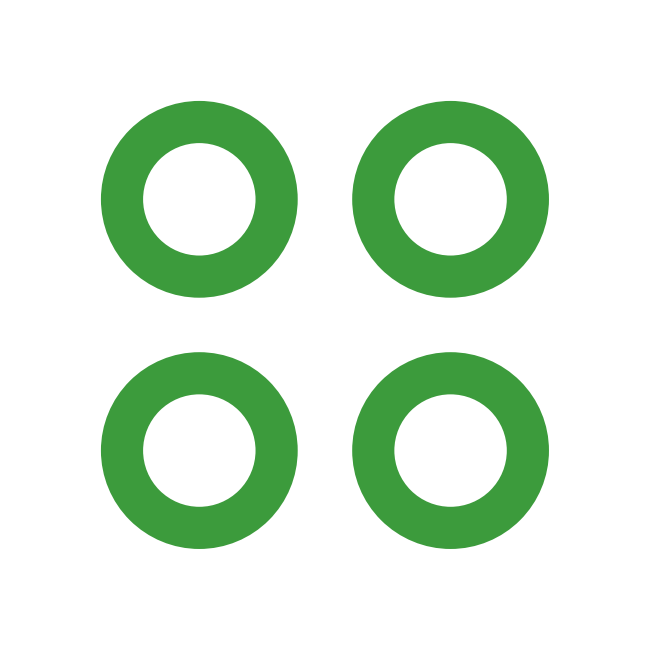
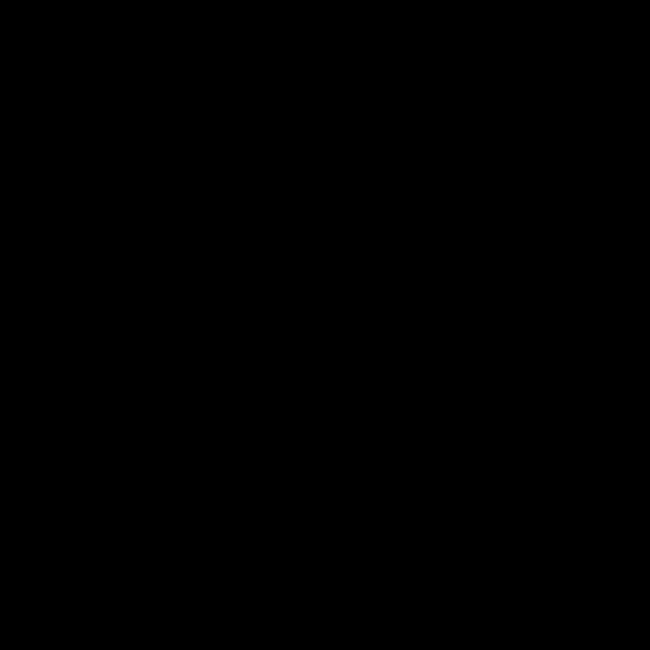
part: (199, 199) -> none
part: (450, 199) -> none
part: (199, 450) -> none
part: (450, 450) -> none

